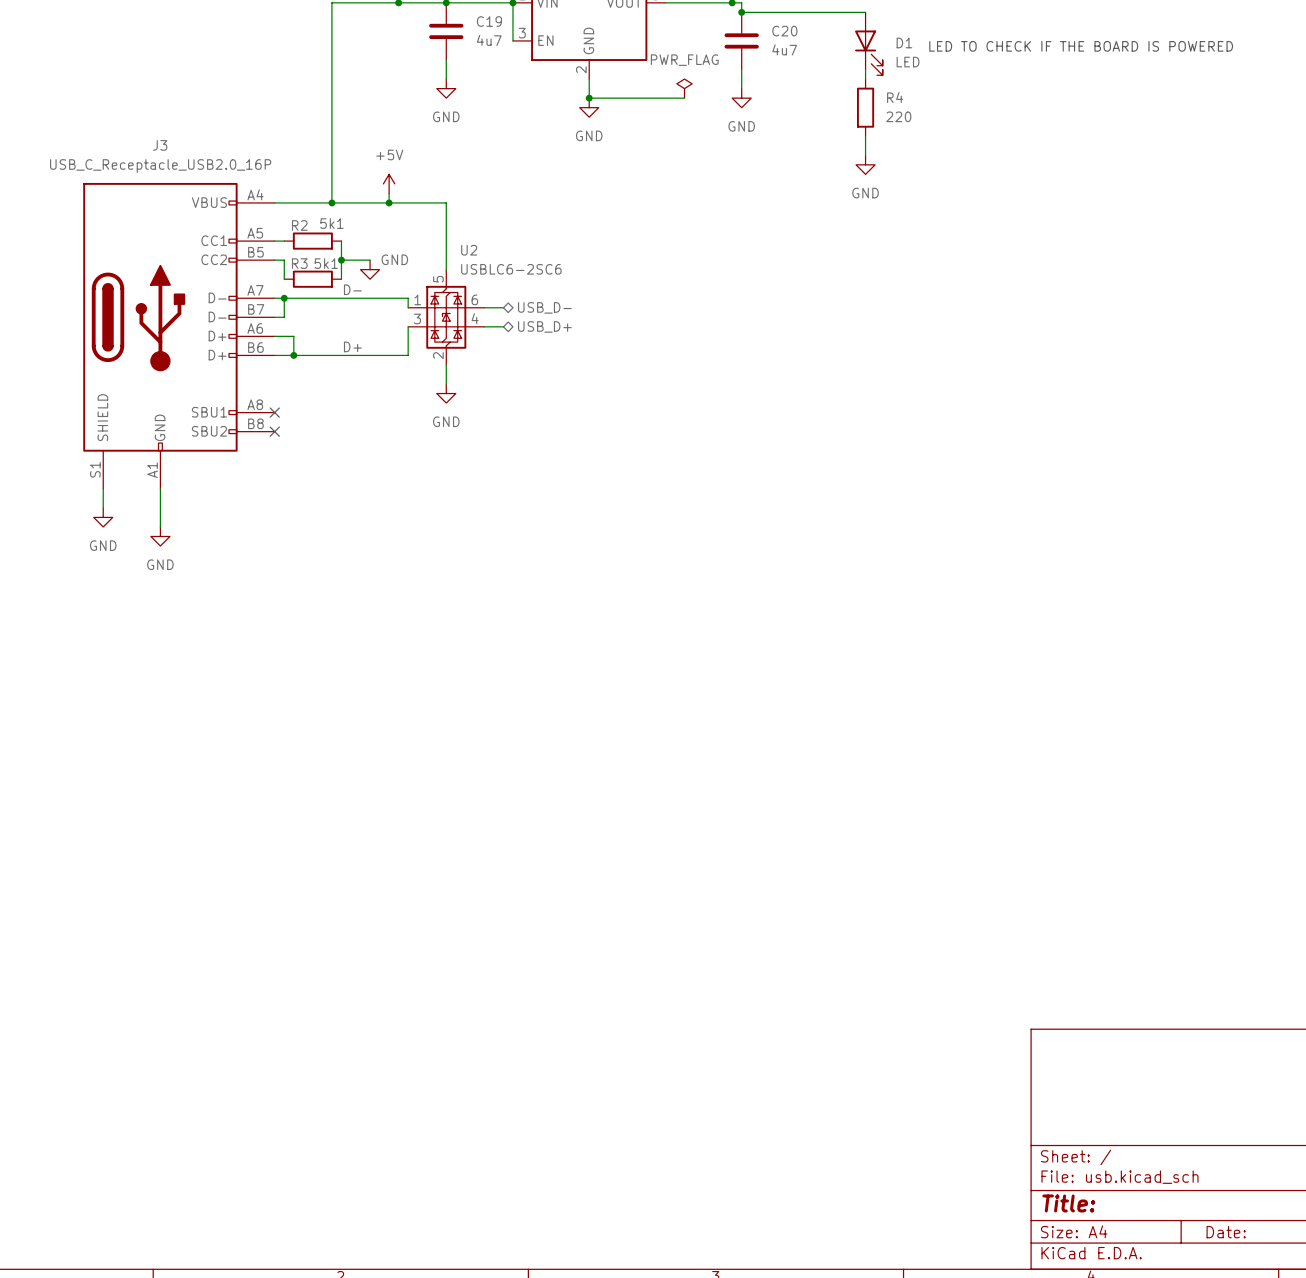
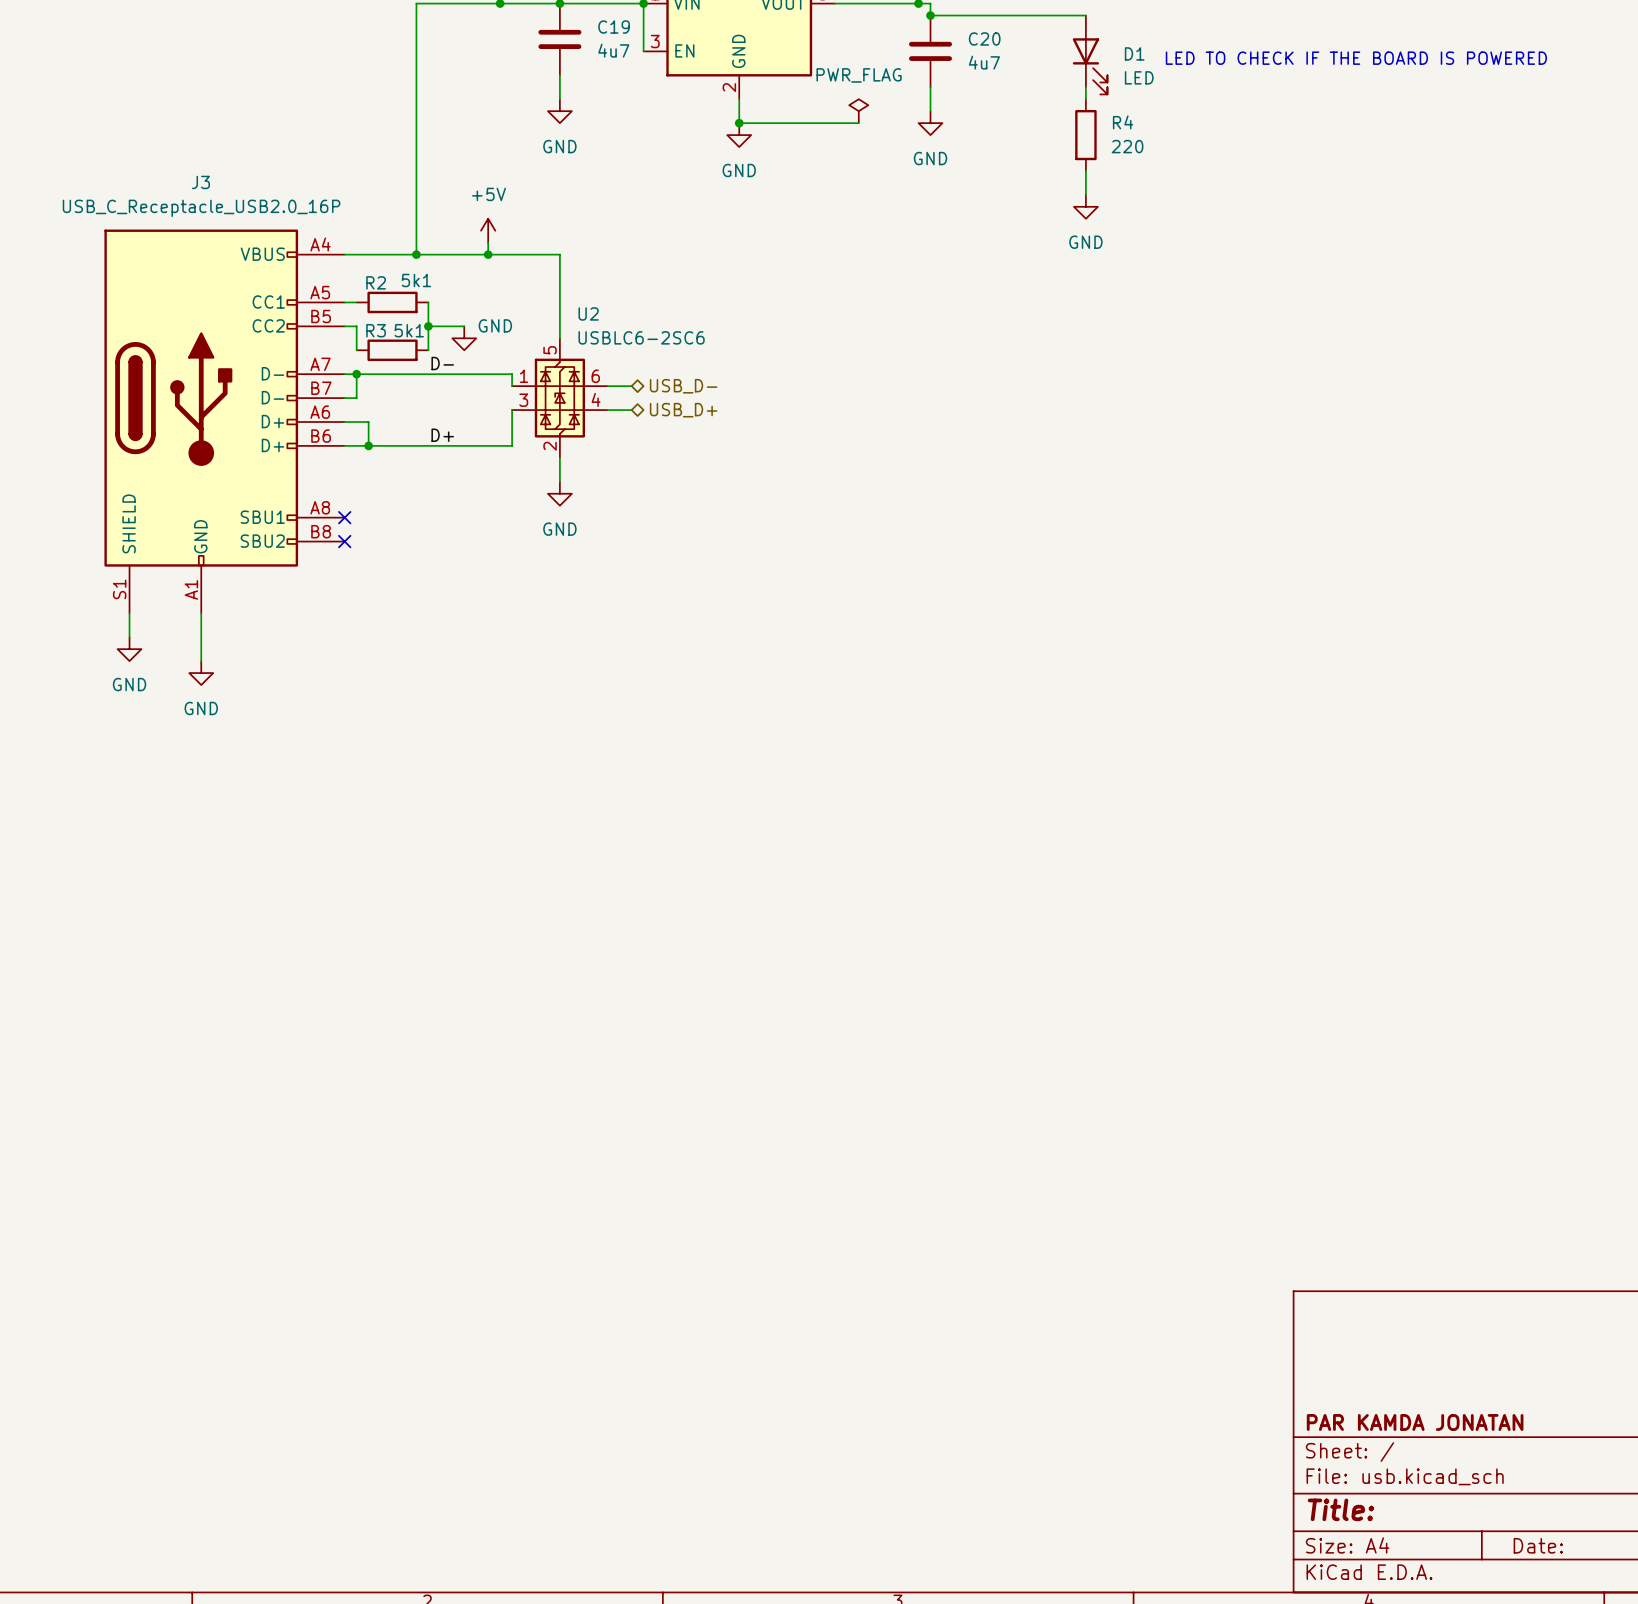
title block: none -> PAR KAMDA JONATAN (1415, 1422)

